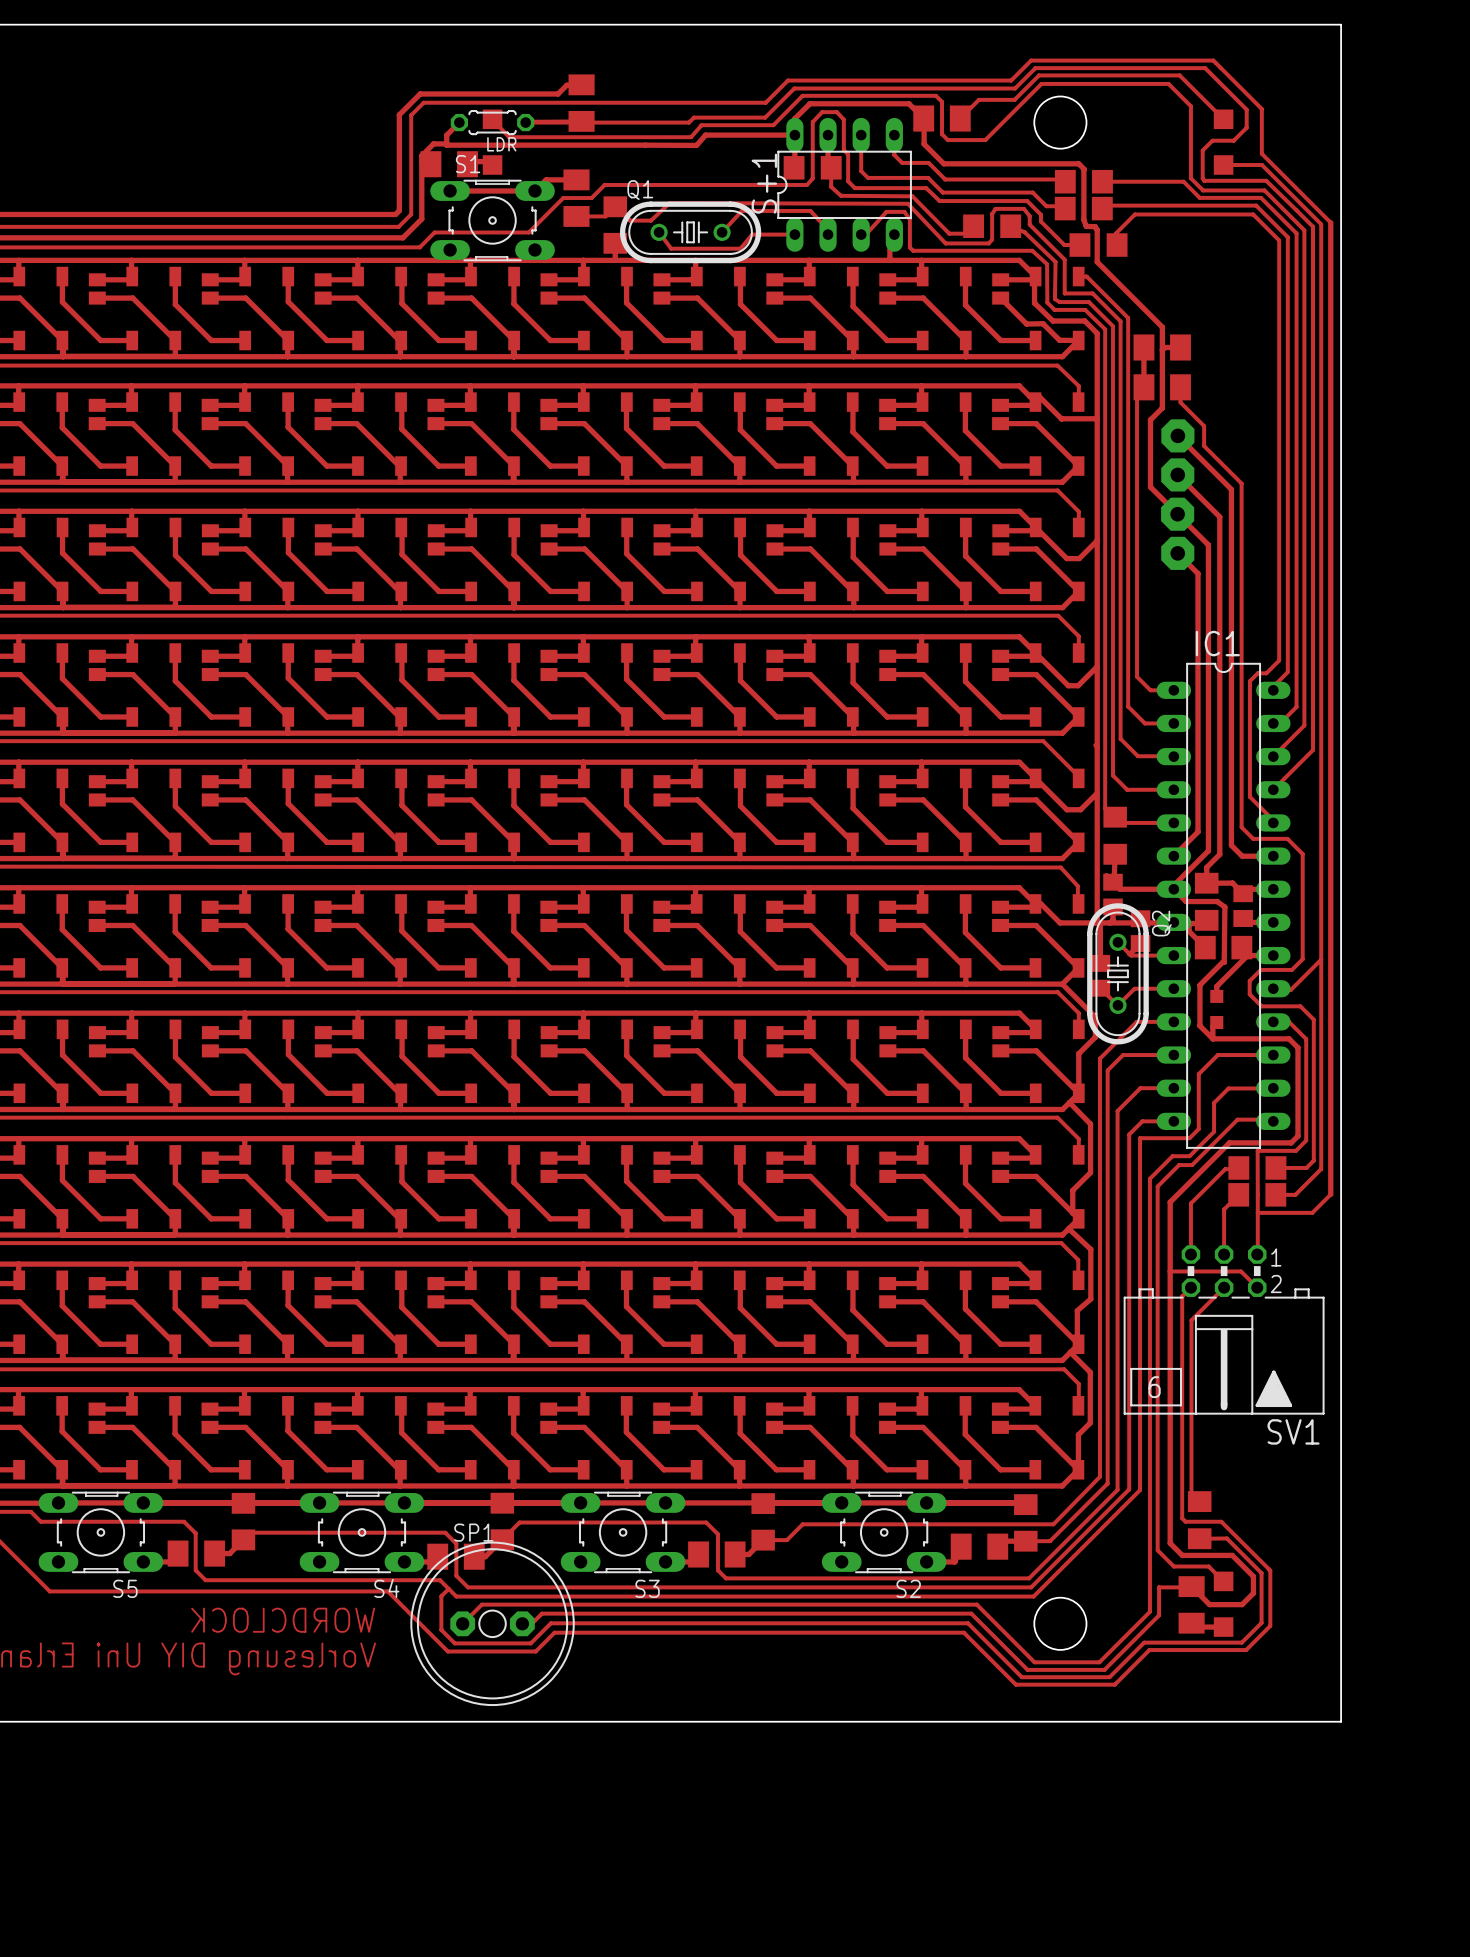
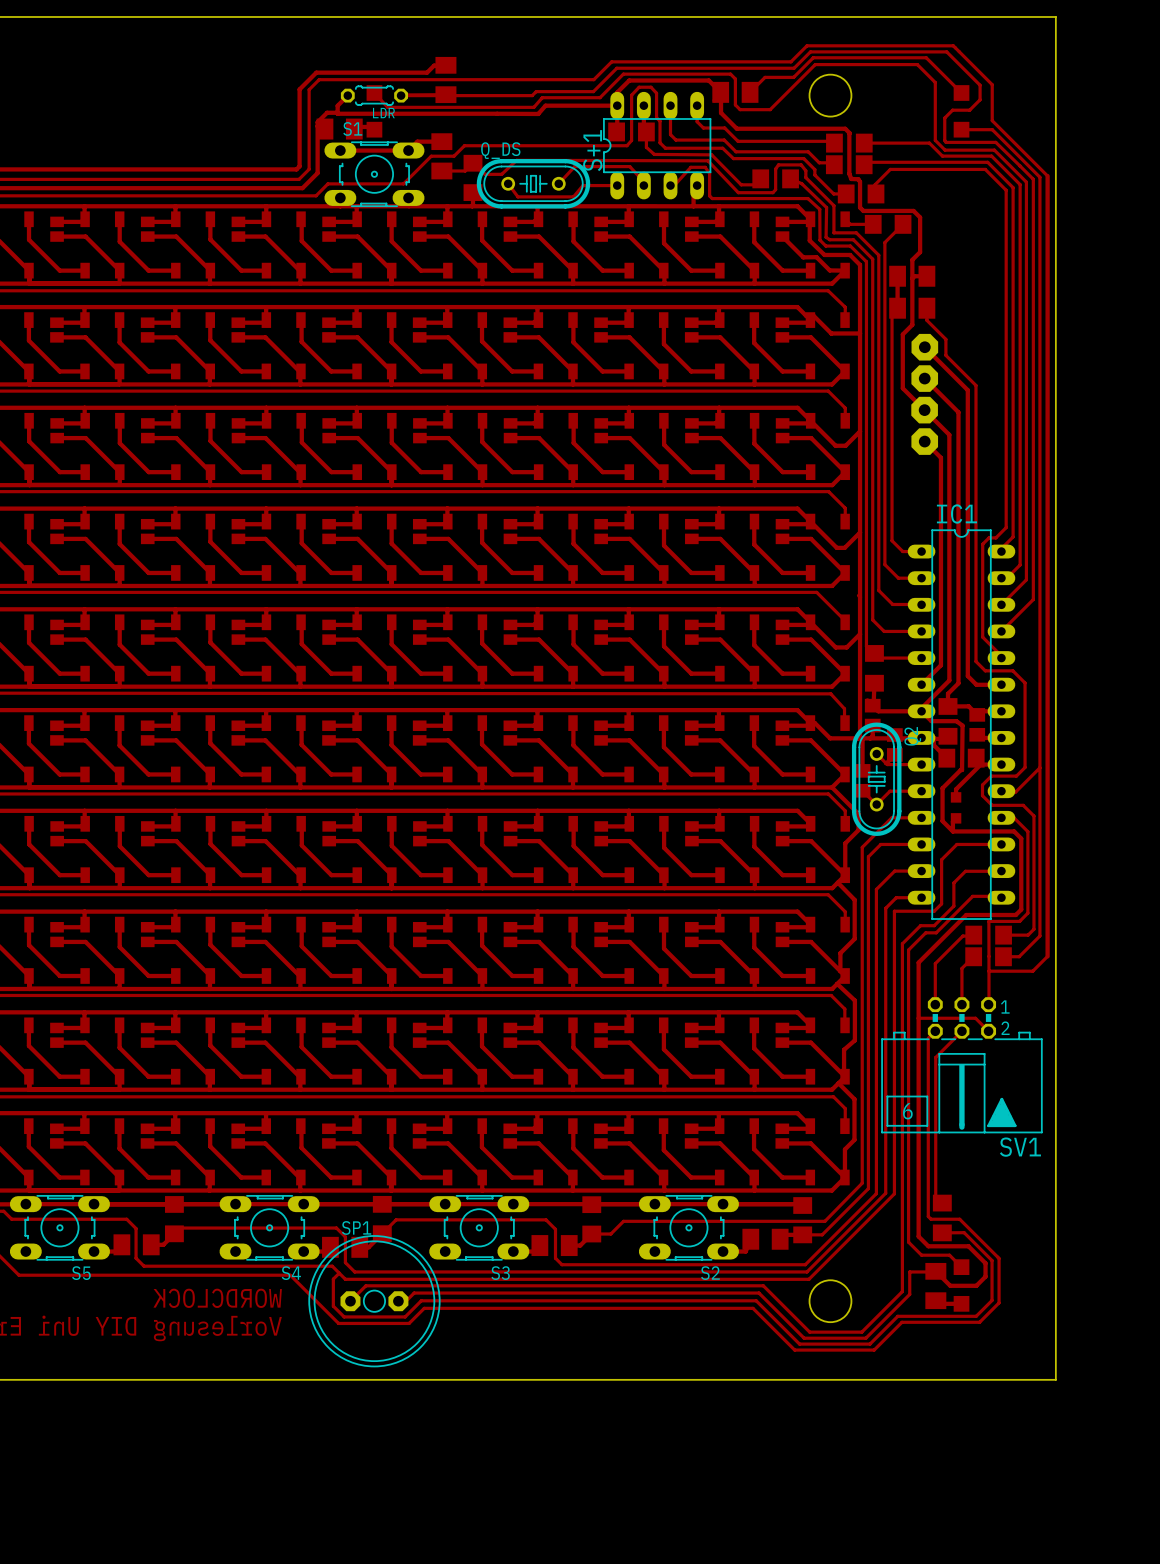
Q1 name: Q1 (640, 190) -> Q_DS (500, 150)
top track: (1101, 266) (1162, 327) -> (863, 210) (913, 210) (920, 217) (920, 252) (912, 259)
top track: (1078, 276) (1086, 276) (1128, 318) -> (845, 219) (850, 224) (873, 224)
part: none -> (888, 224)
top track: none -> (903, 224) (884, 242) (884, 252)

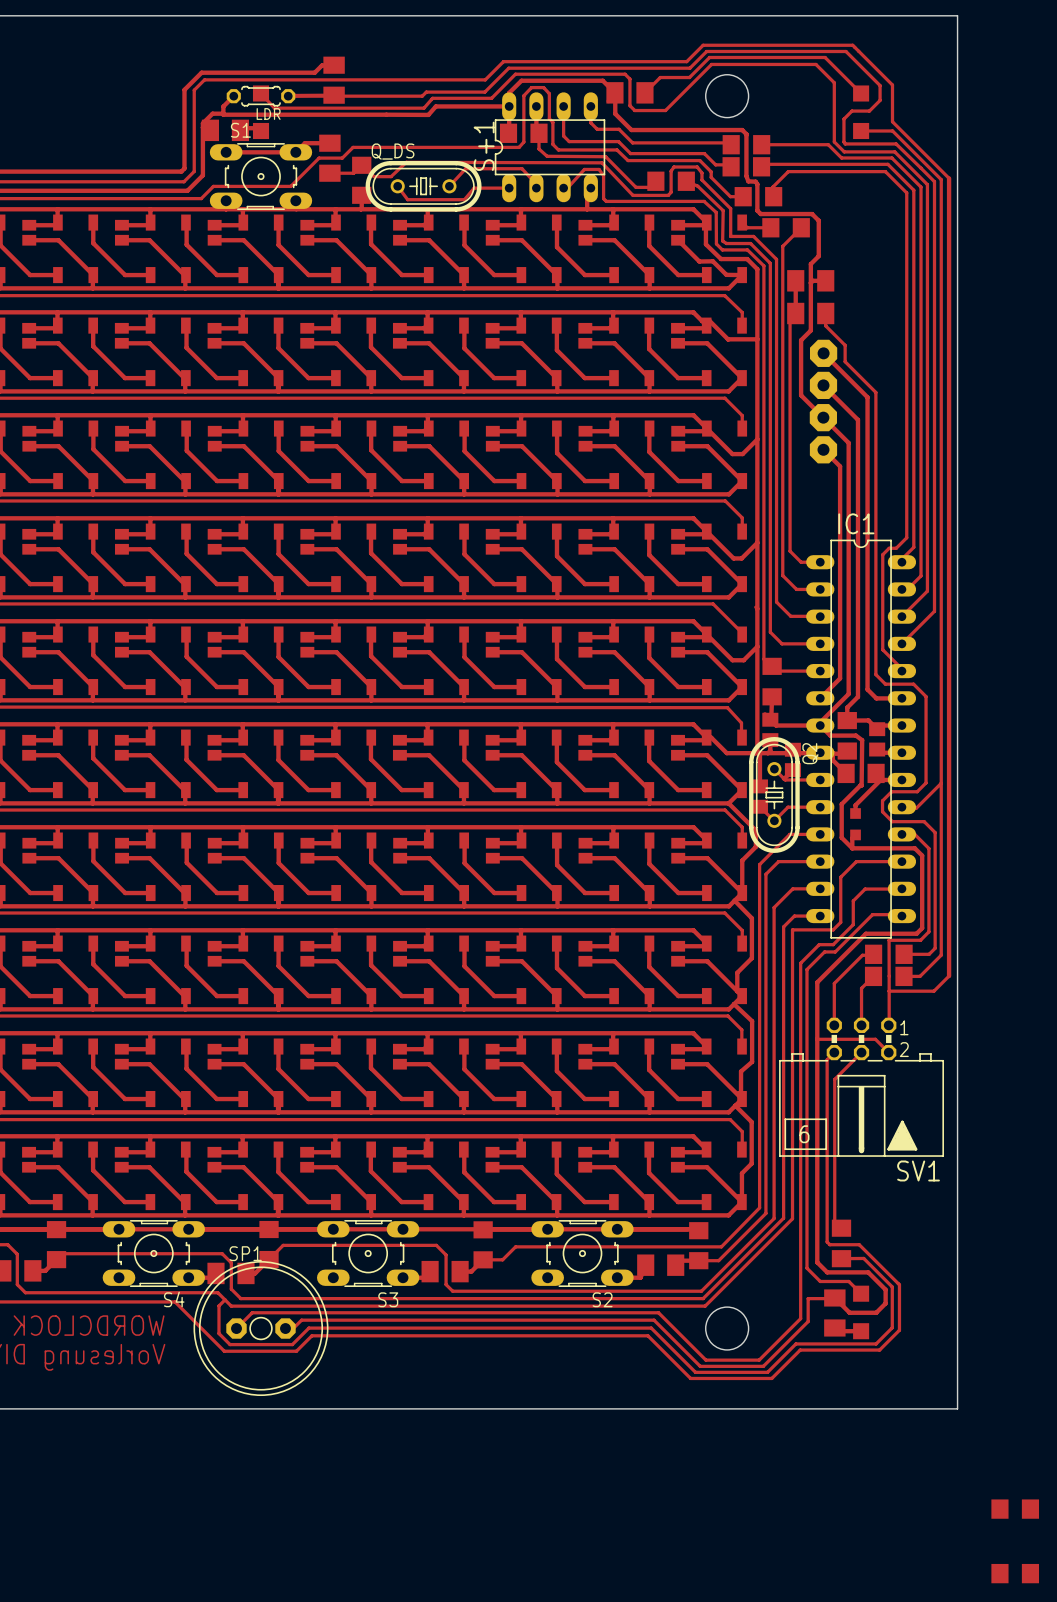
part: none -> (1015, 1509)
part: none -> (1015, 1573)

